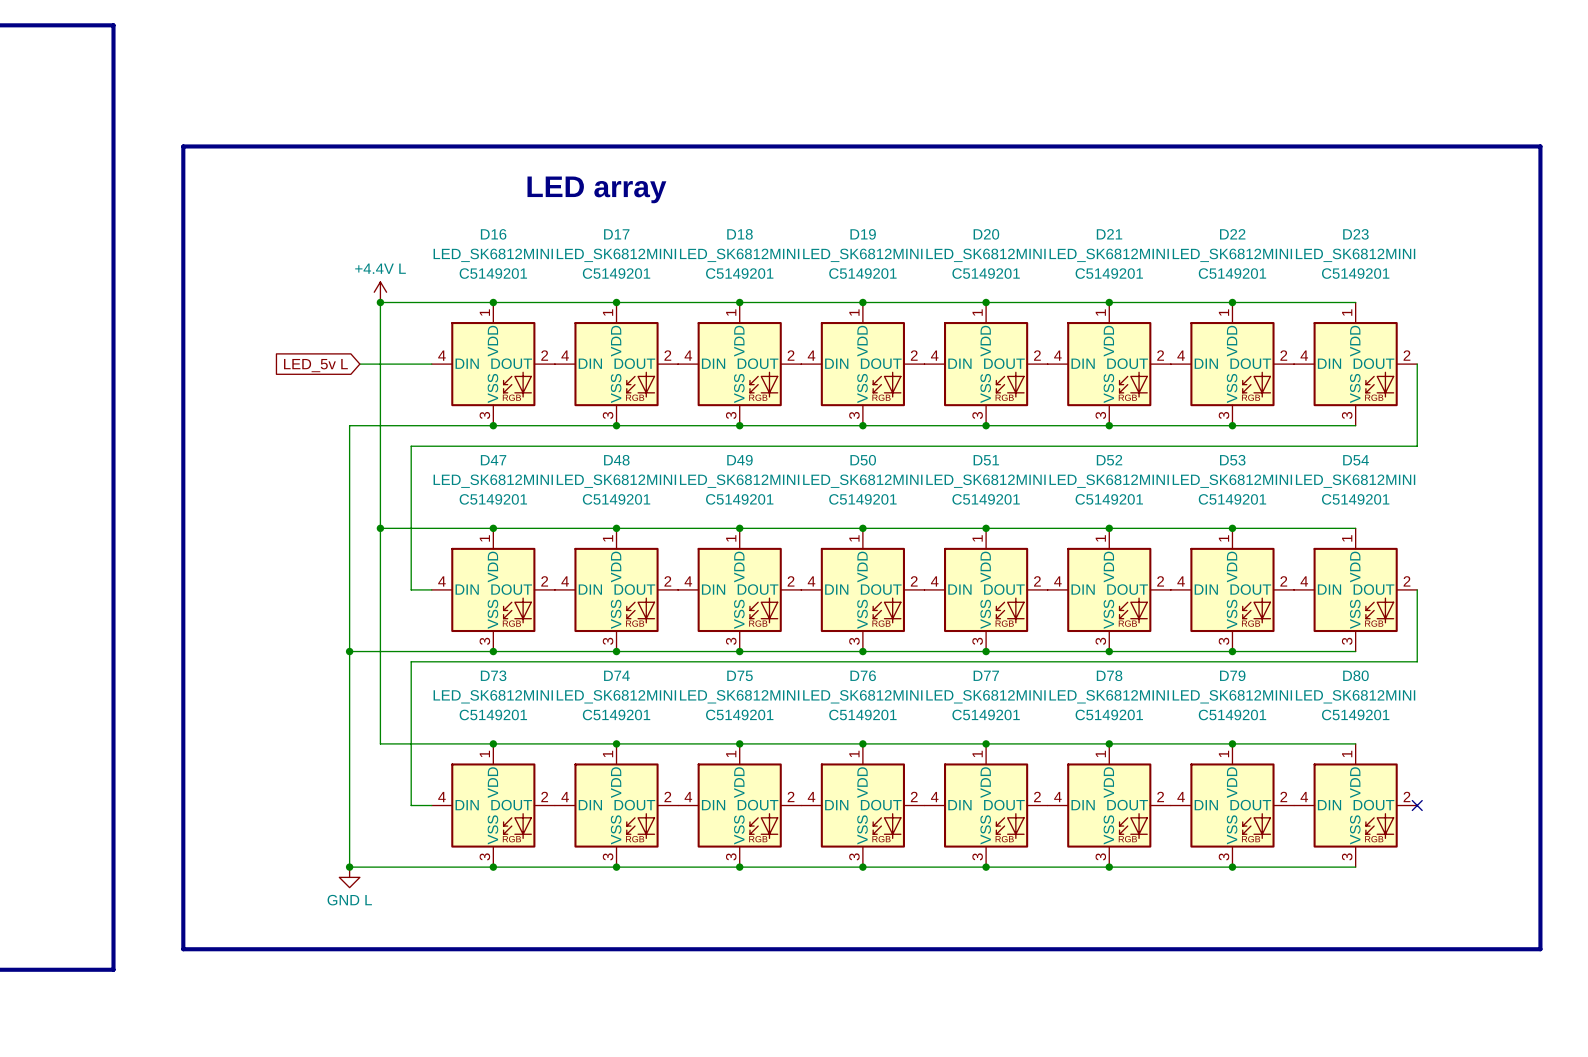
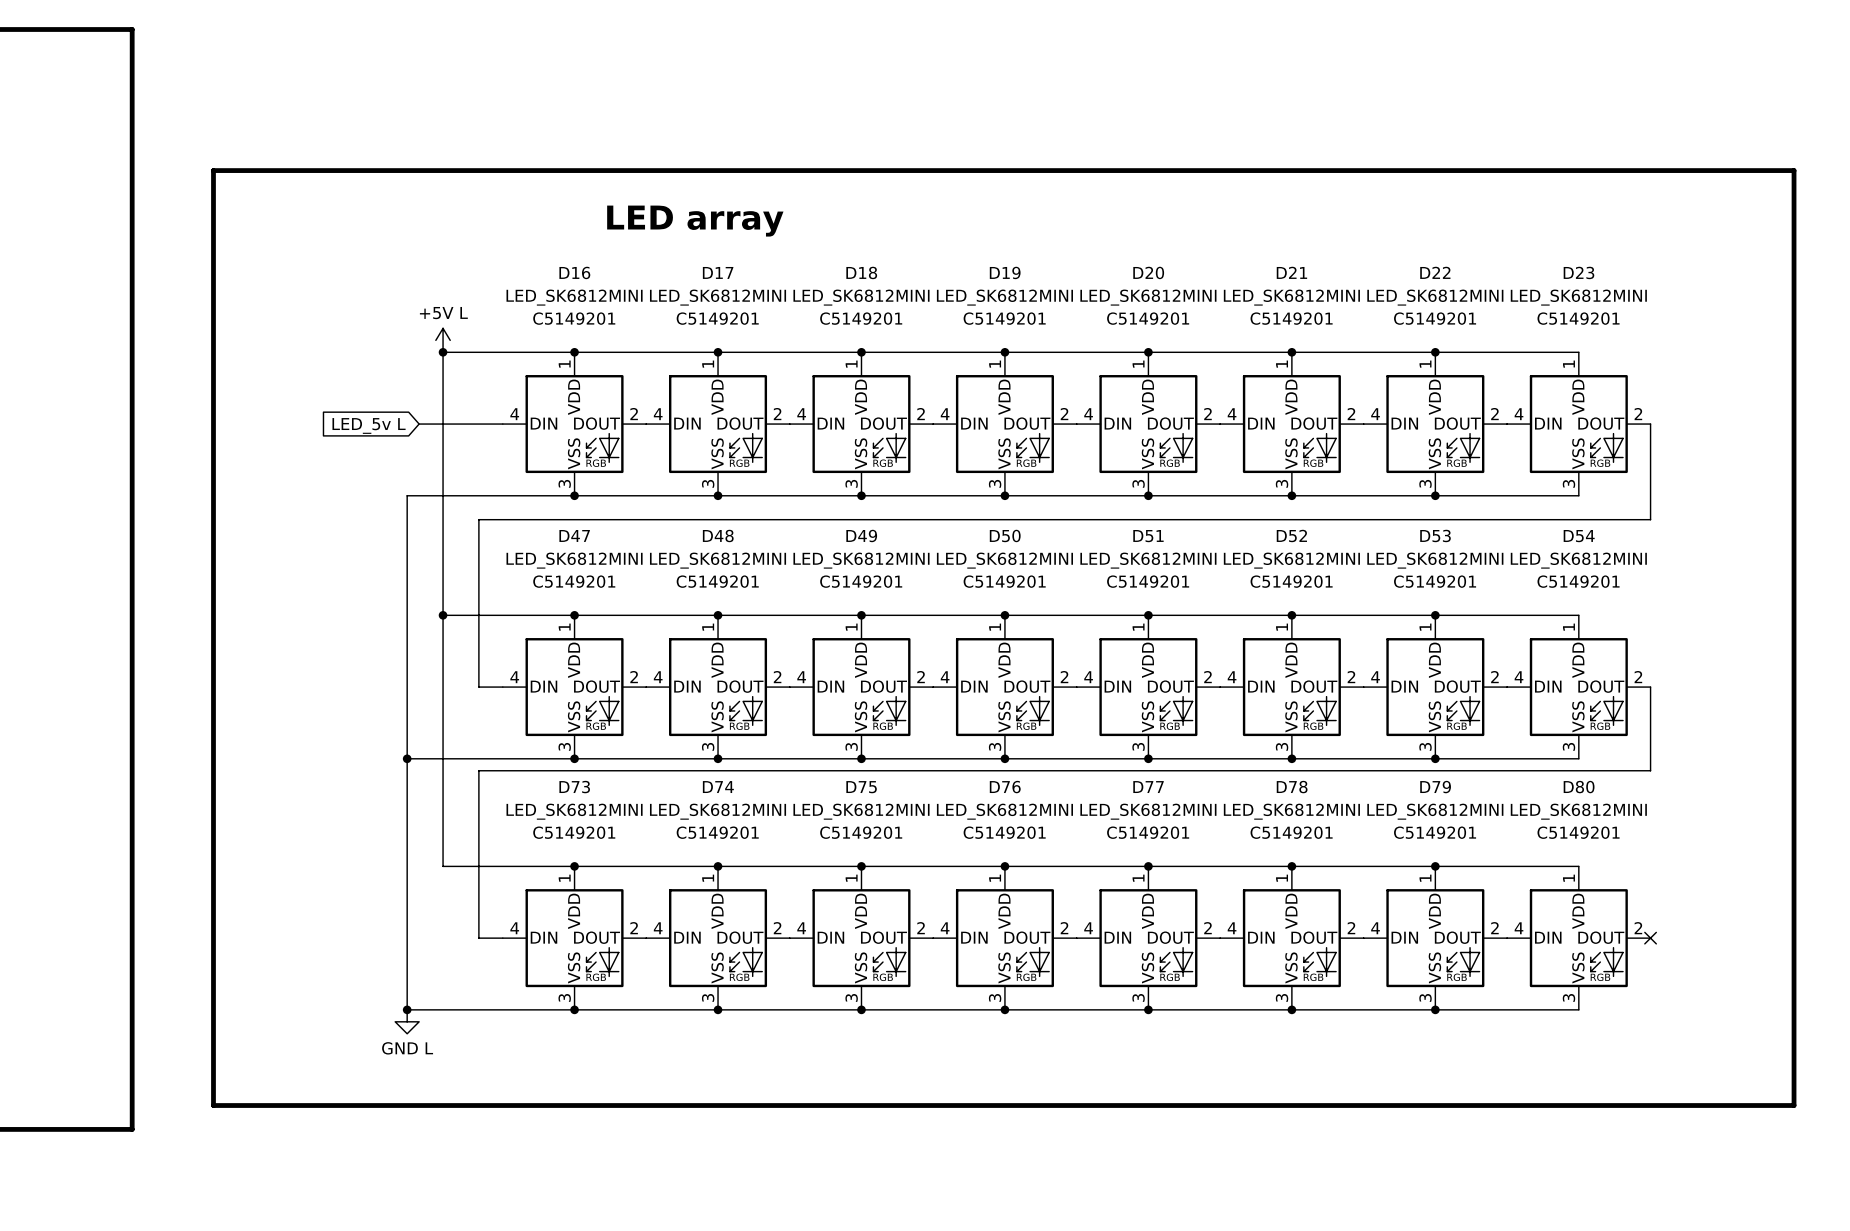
power symbol: +4.4V L (380, 292) -> +5V L (443, 340)

